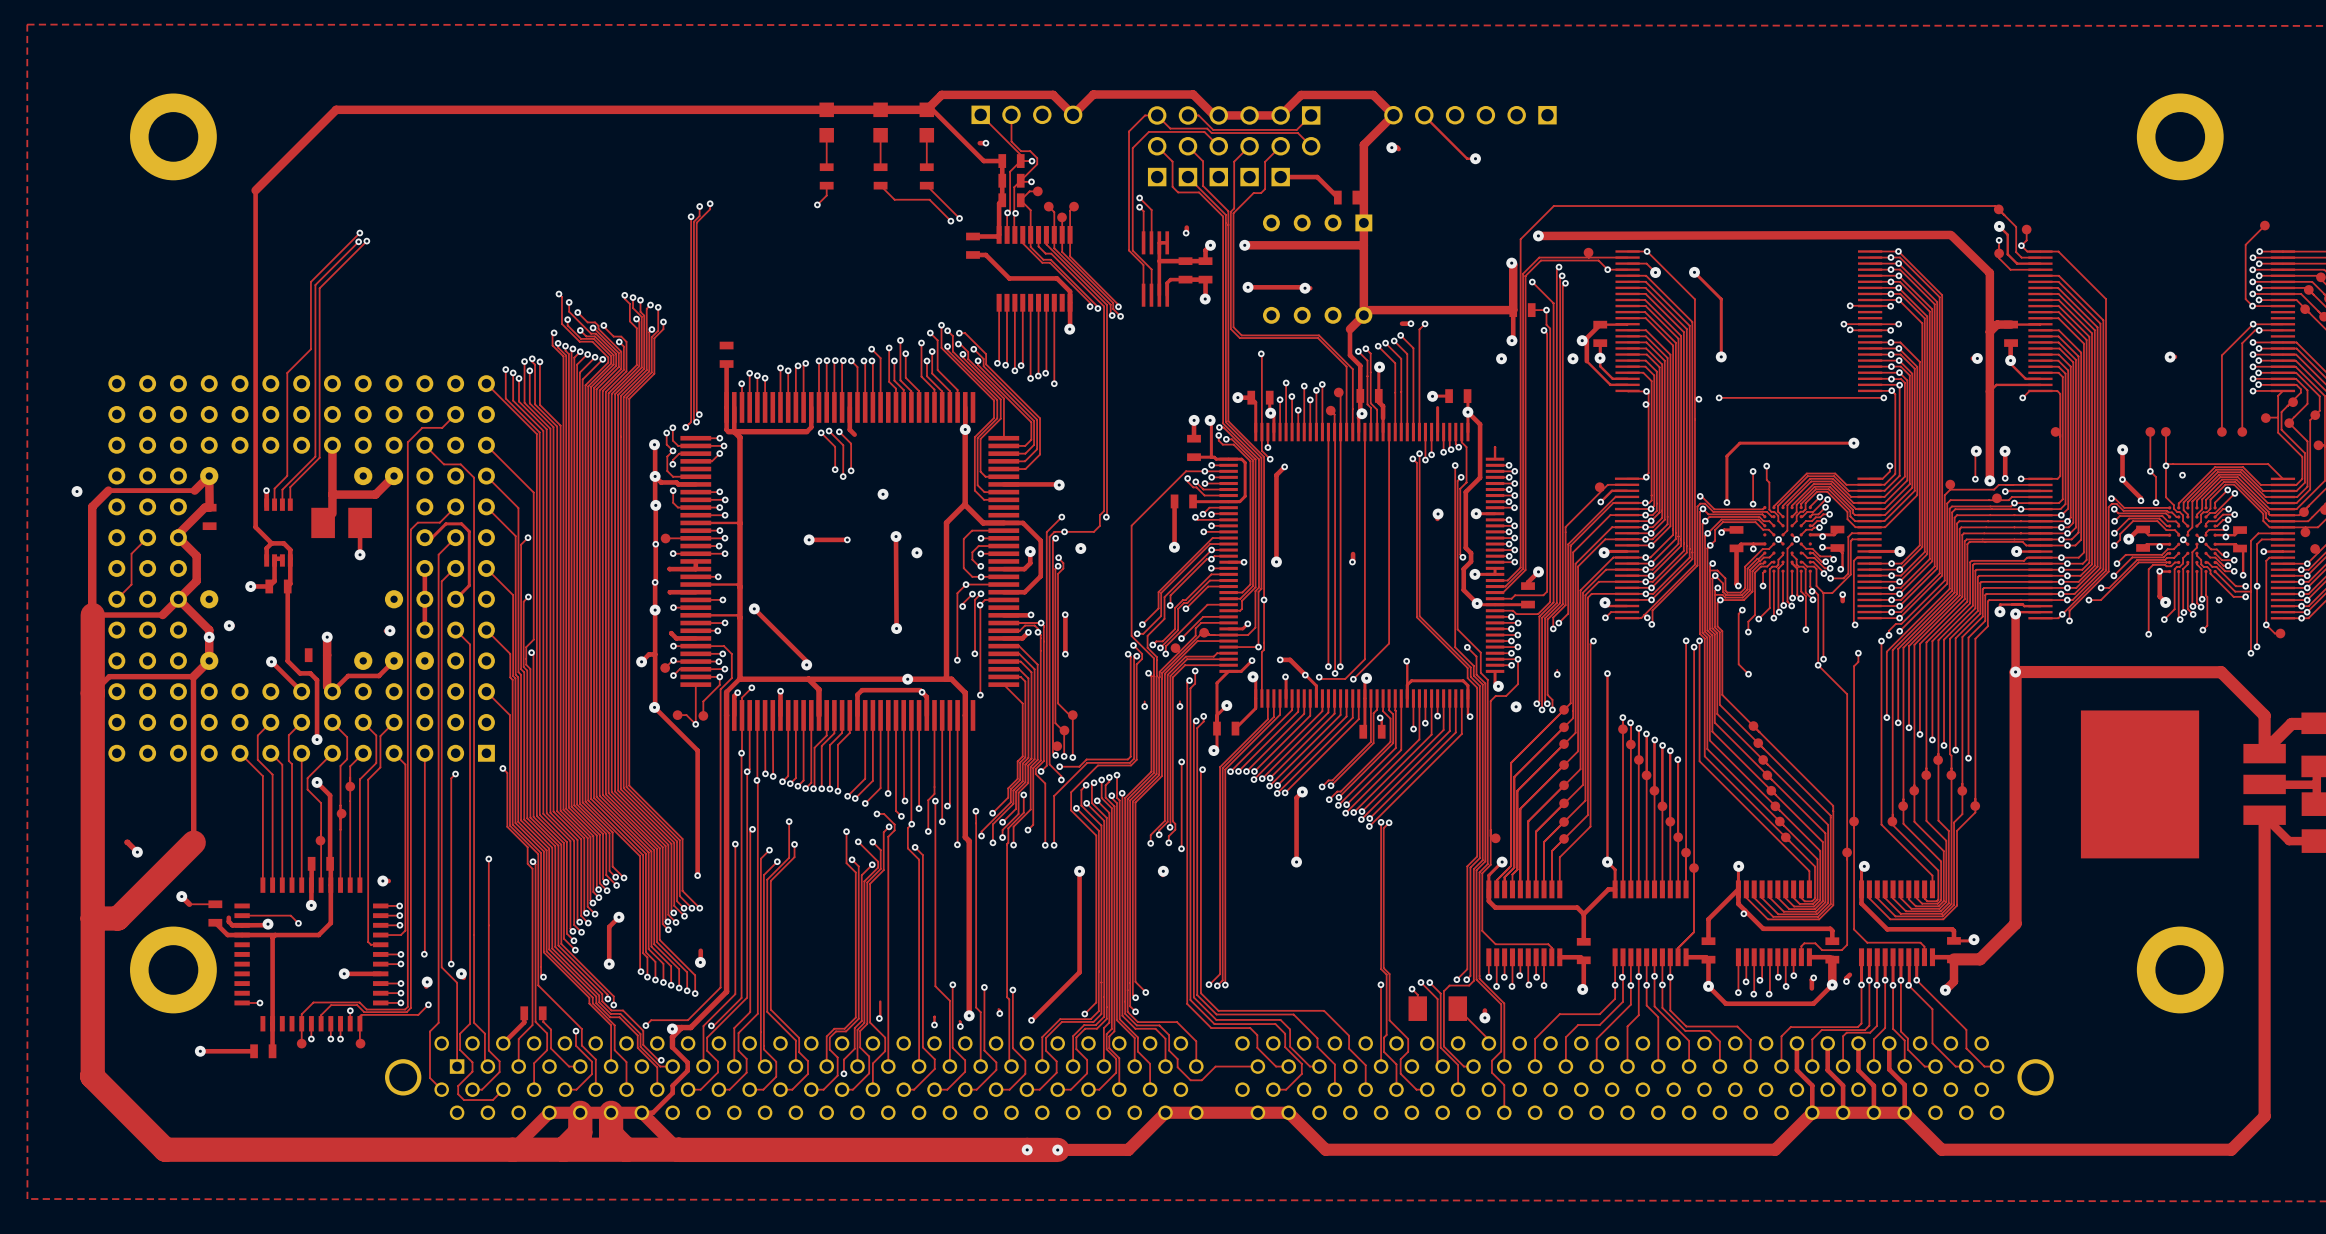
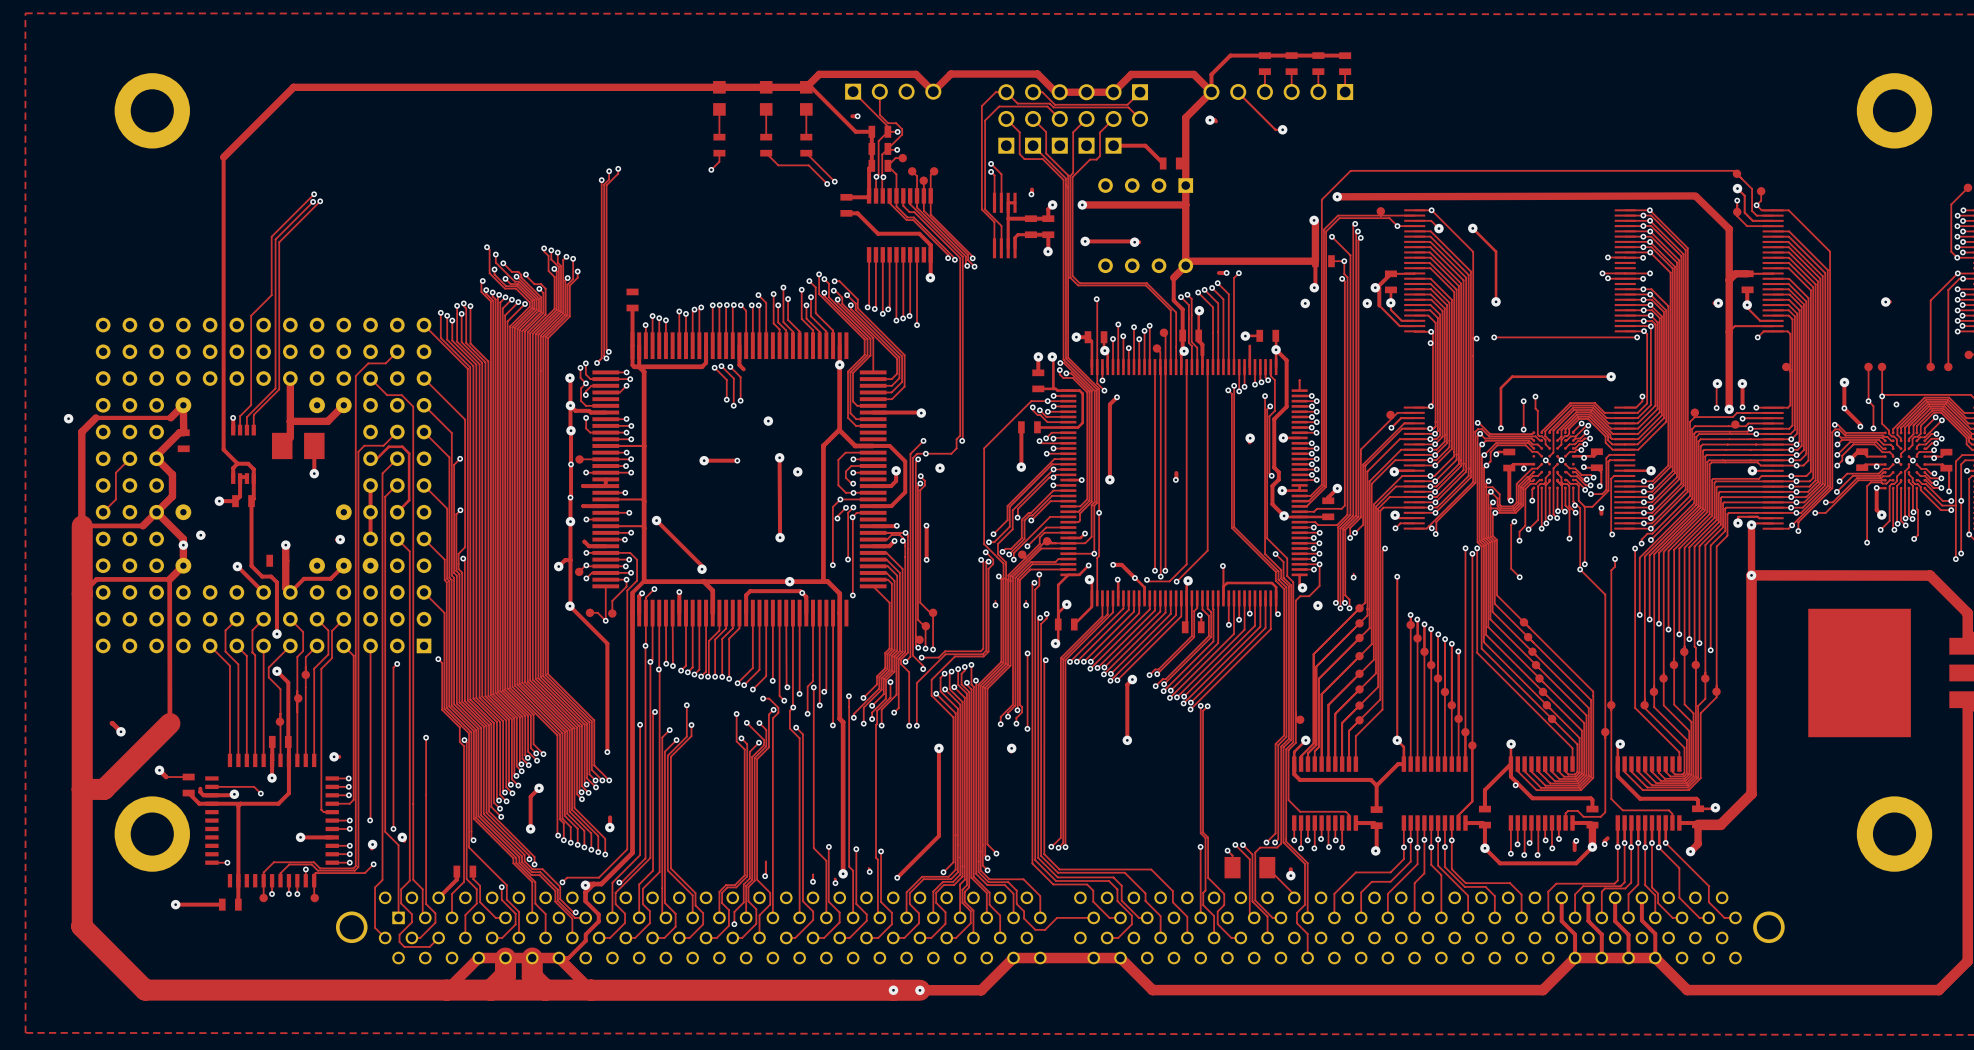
track: none -> (1345, 55) (1230, 55) (1211, 74) (1211, 92)
part: none -> (1264, 63)
part: none -> (1291, 63)
part: none -> (1318, 63)
part: none -> (1345, 63)
track: none -> (1264, 71) (1264, 92)
track: none -> (1291, 71) (1291, 91)
track: none -> (1318, 71) (1318, 91)
track: none -> (1345, 71) (1345, 91)

